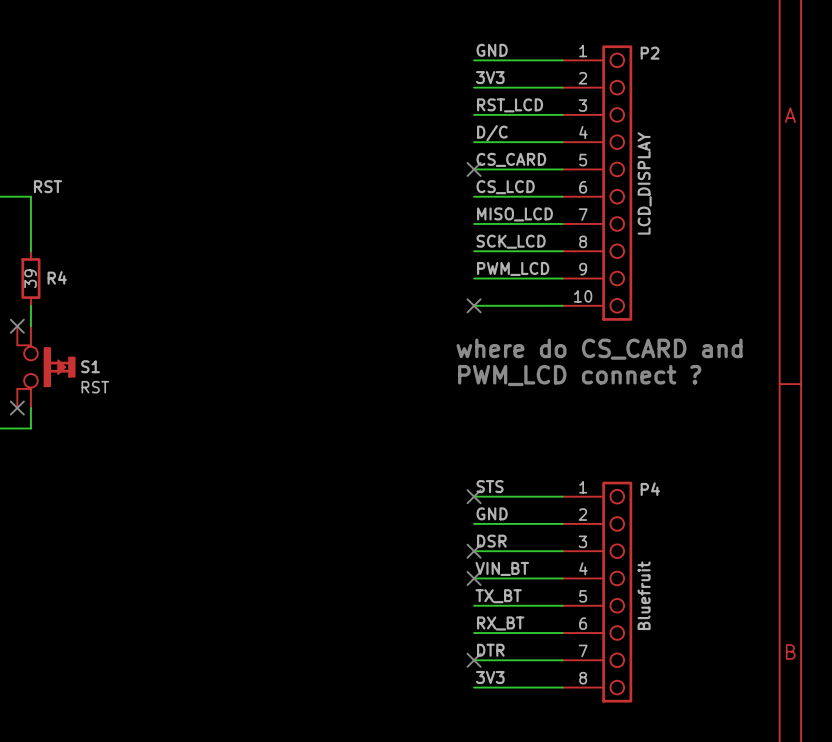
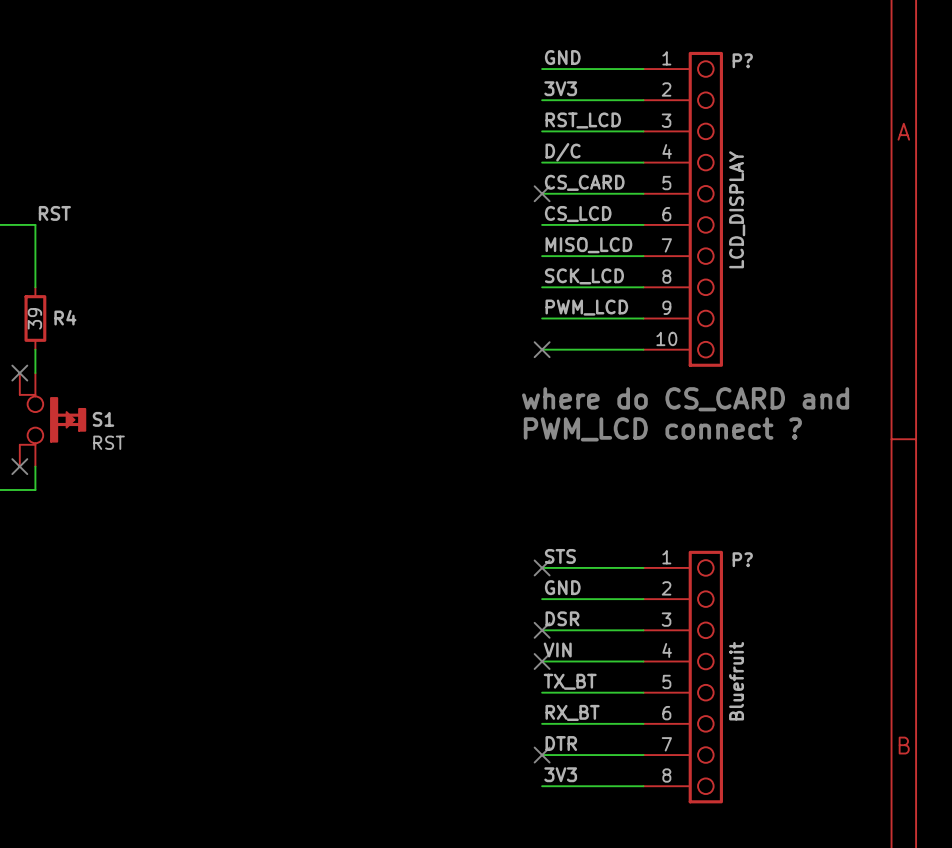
P2 name: P2 (650, 53) -> P? (742, 60)
P4 name: P4 (650, 489) -> P? (742, 559)
label: VIN_BT (502, 568) -> VIN (557, 649)

